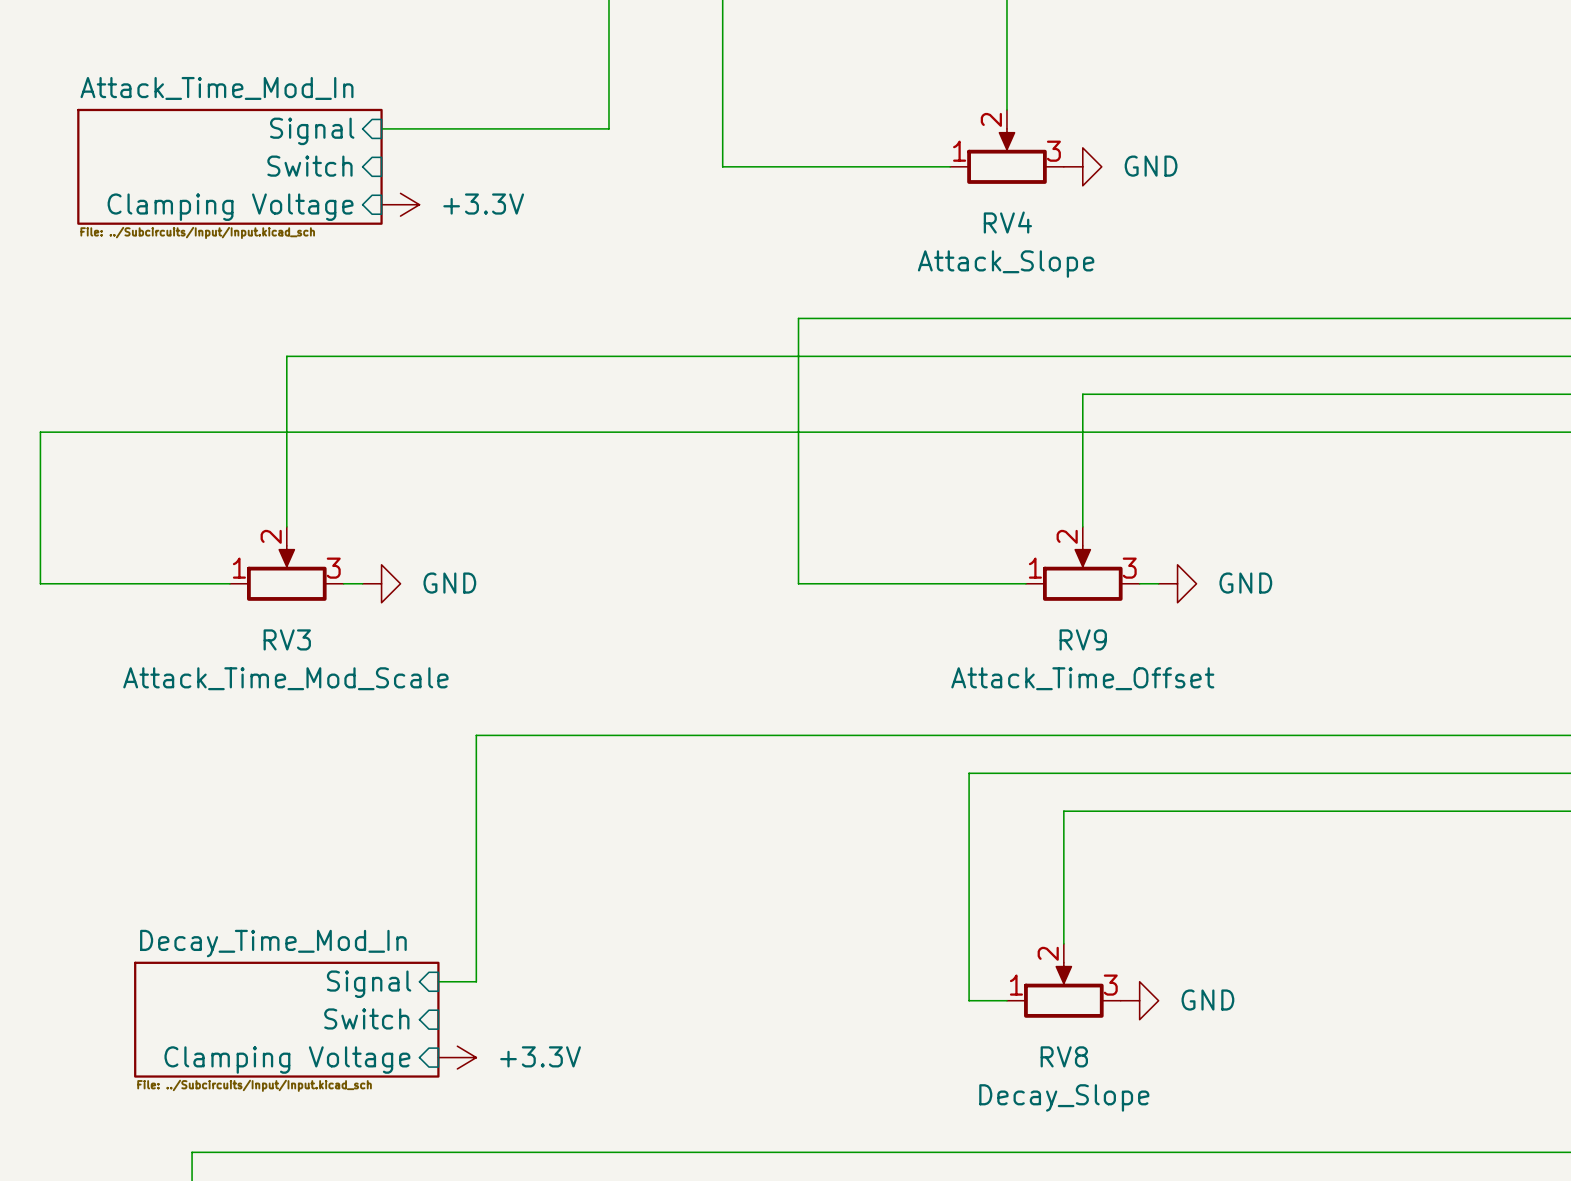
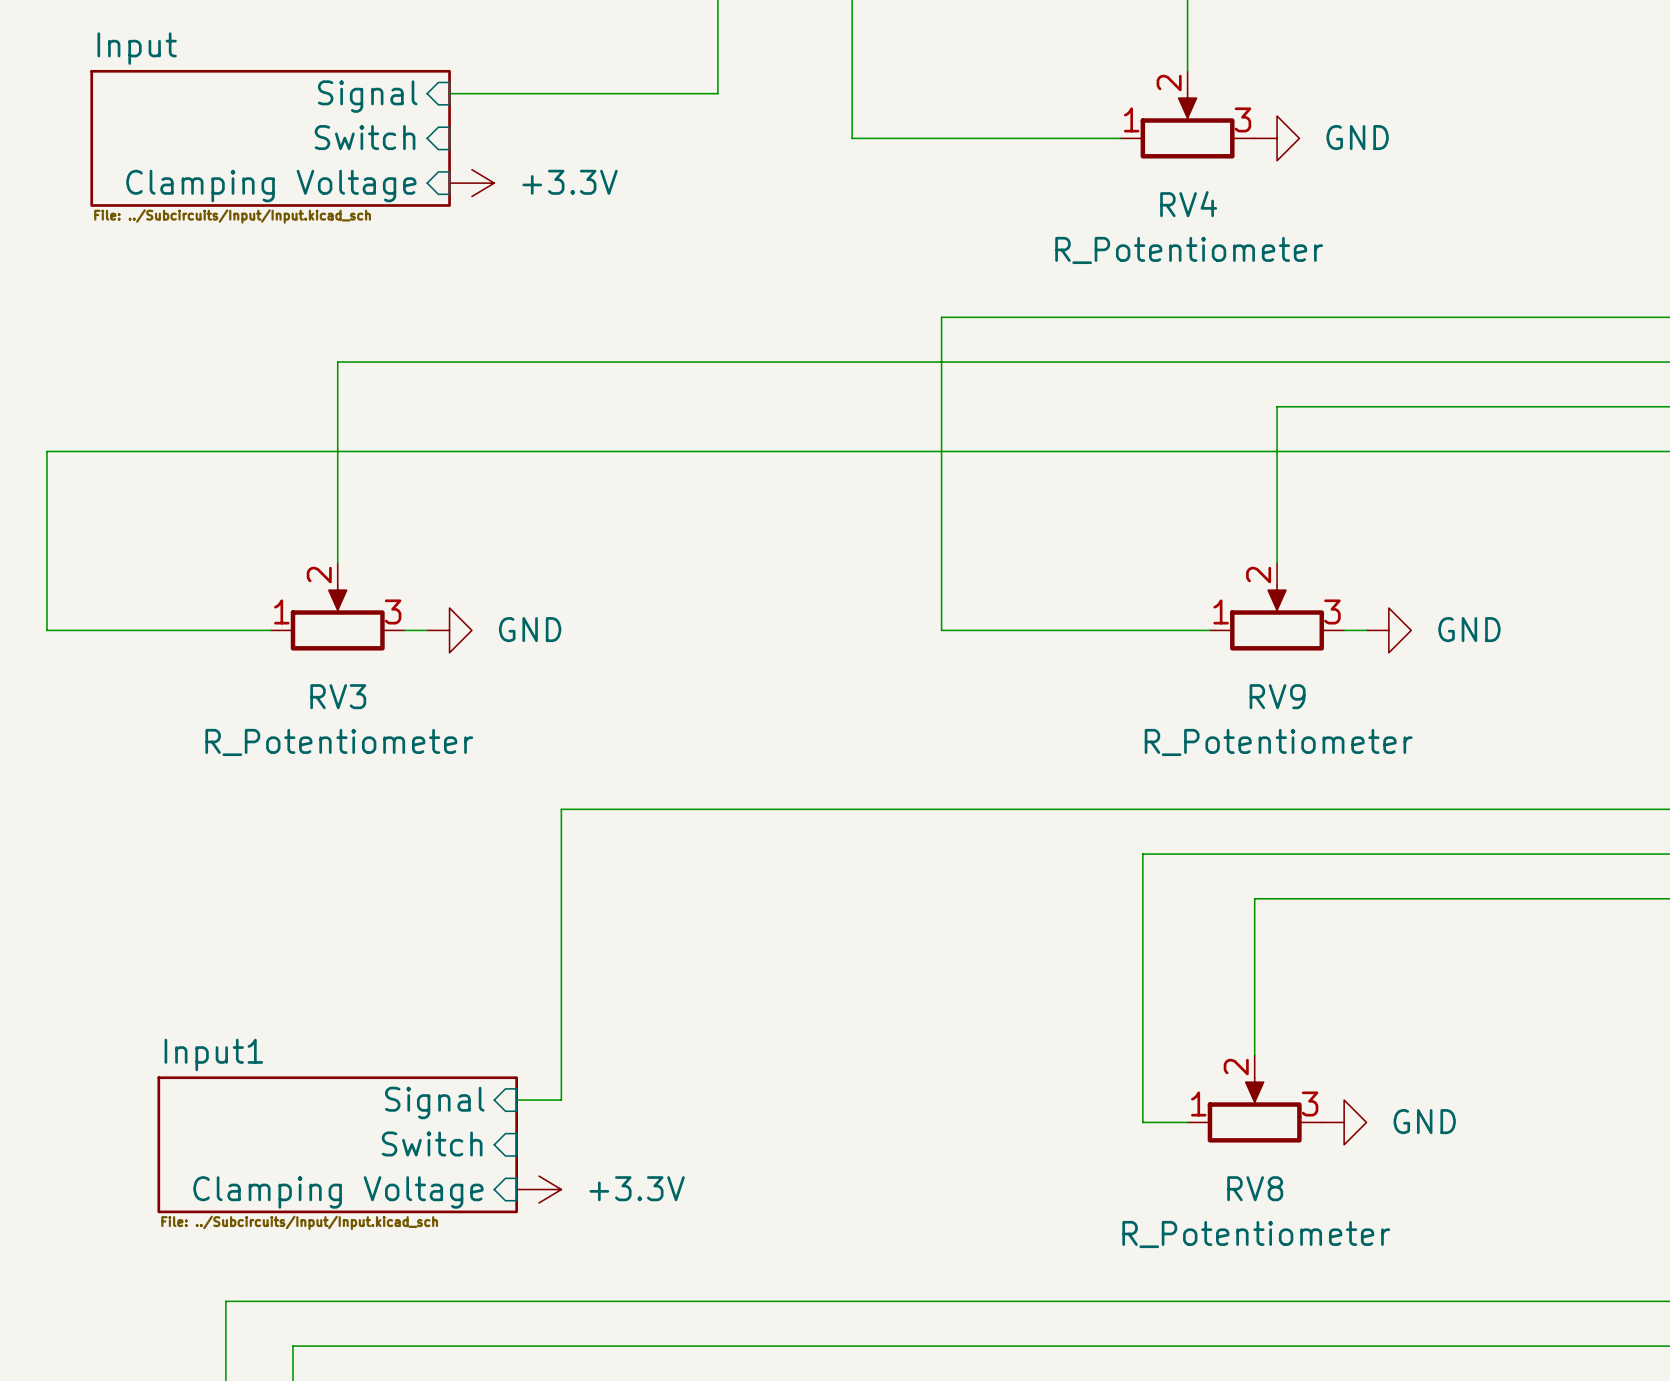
sheet Attack_Time_Mod_In name: Attack_Time_Mod_In (217, 88) -> Input (137, 48)
RV4 value: Attack_Slope (1006, 264) -> R_Potentiometer (1189, 250)
RV3 value: Attack_Time_Mod_Scale (285, 678) -> R_Potentiometer (339, 742)
RV9 value: Attack_Time_Offset (1082, 678) -> R_Potentiometer (1278, 742)
sheet Decay_Time_Mod_In name: Decay_Time_Mod_In (273, 943) -> Input1 (213, 1054)
RV8 value: Decay_Slope (1064, 1097) -> R_Potentiometer (1256, 1234)

